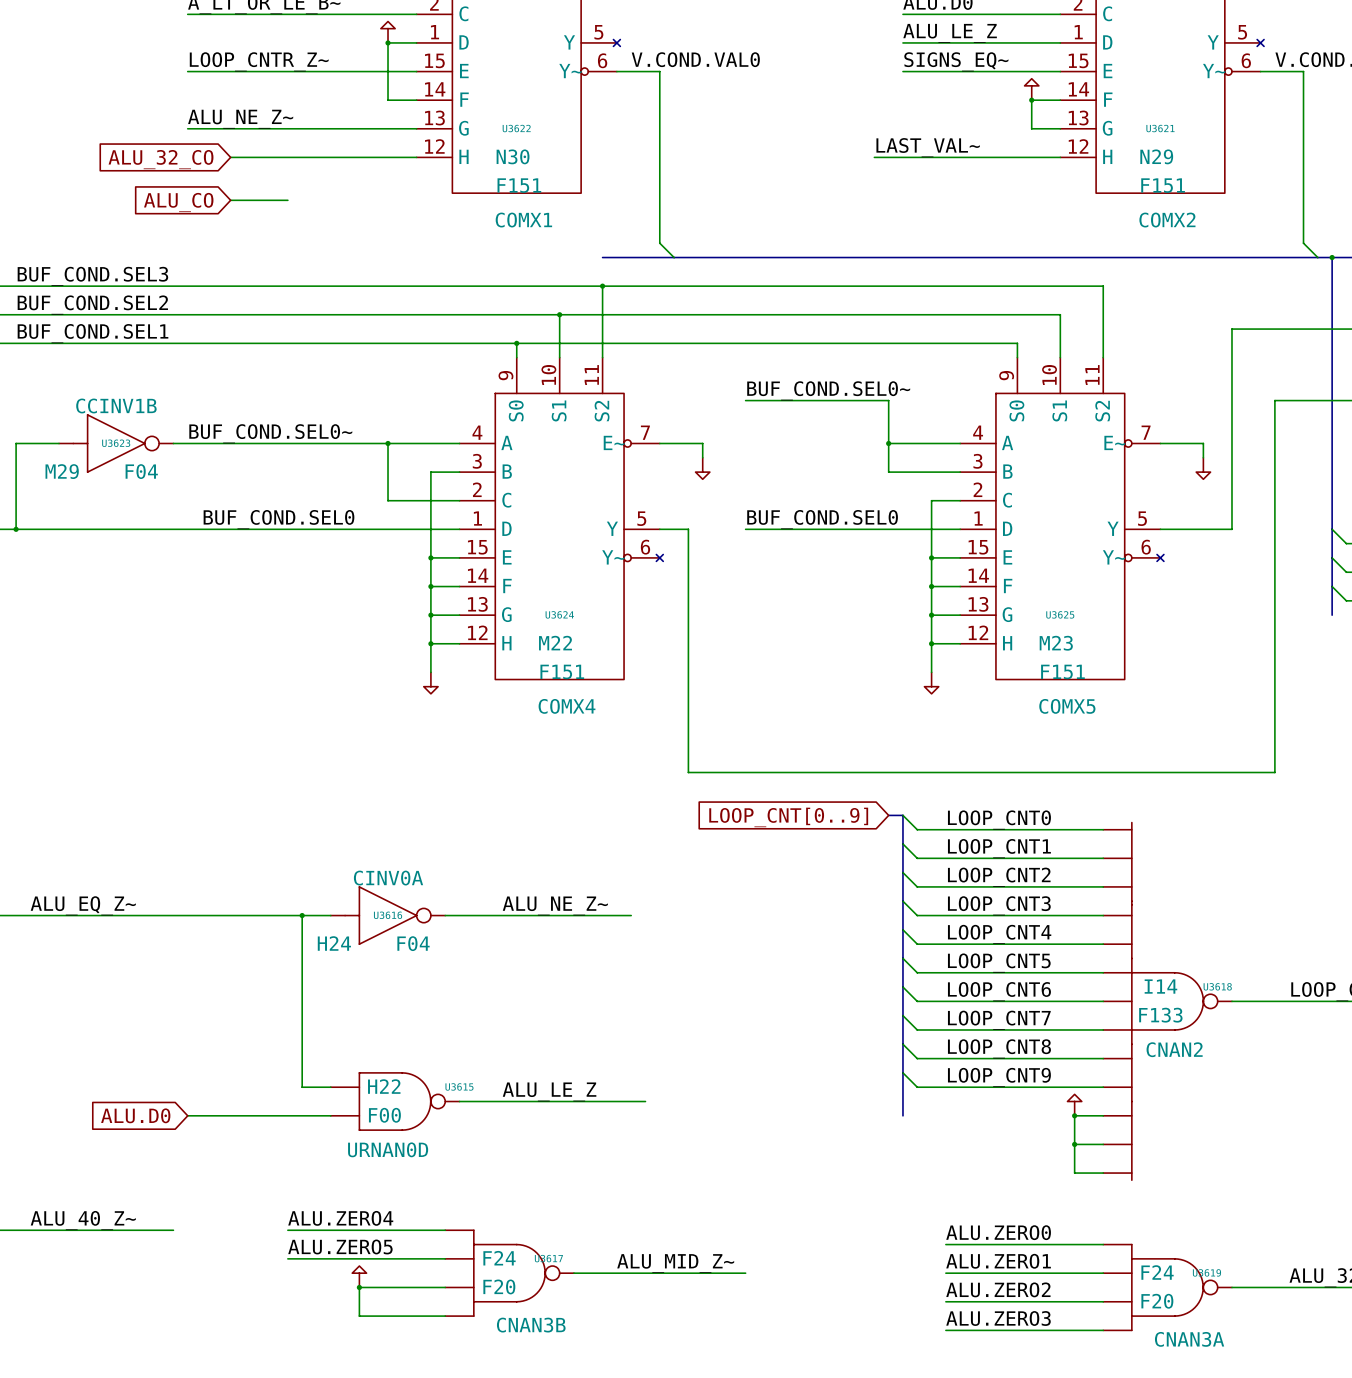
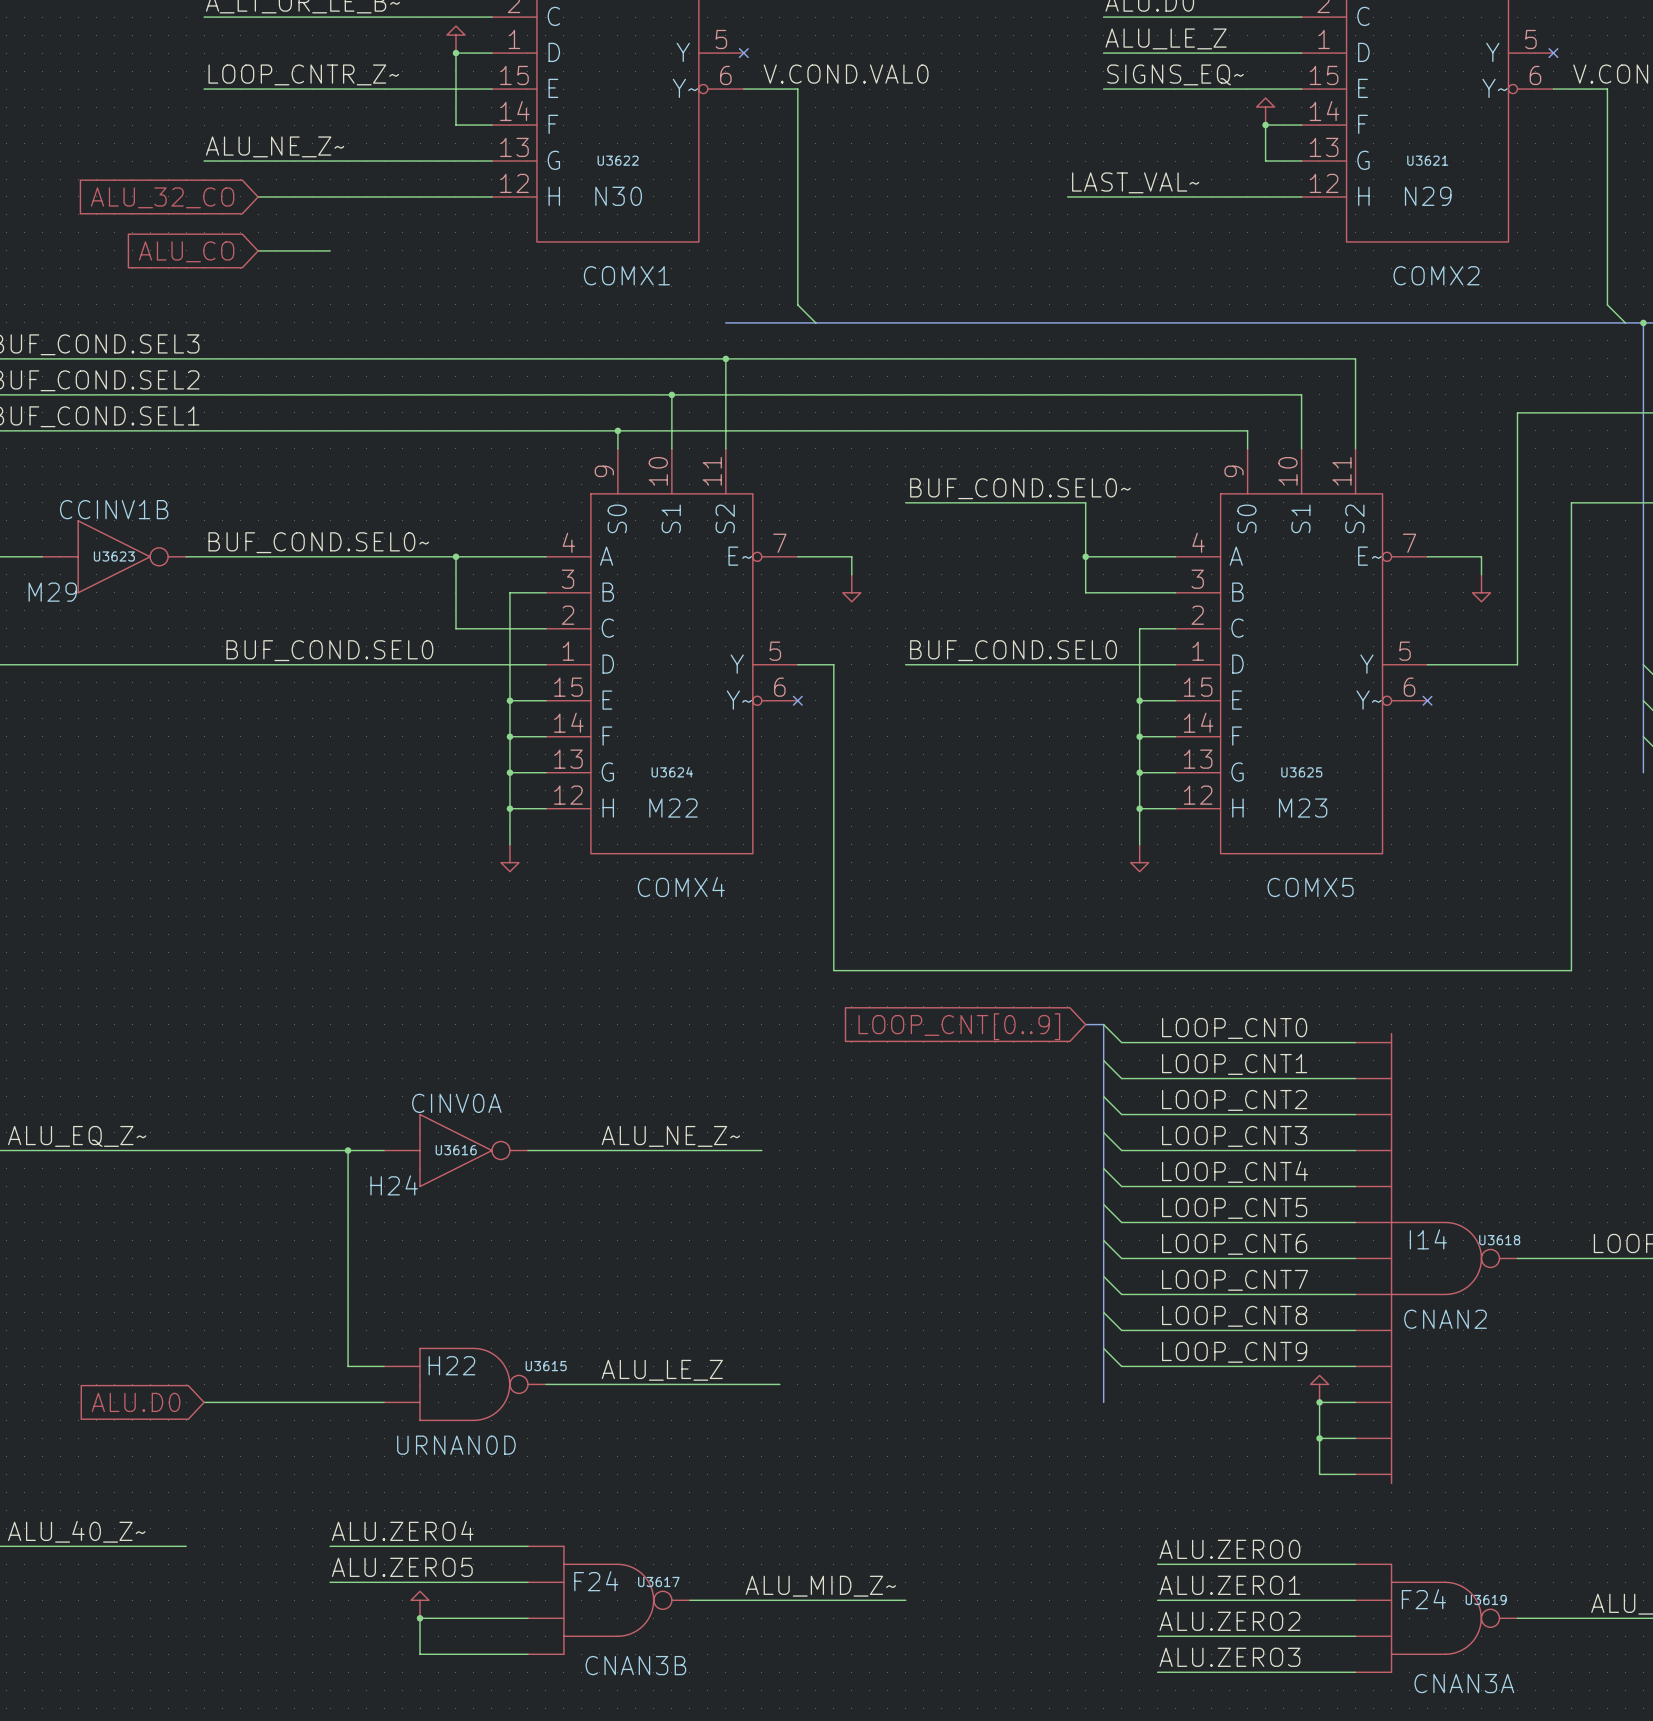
U3622 value: F151 (519, 185) -> none
U3621 value: F151 (1163, 185) -> none
U3623 value: F04 (141, 471) -> none
U3624 value: F151 (562, 671) -> none
U3625 value: F151 (1062, 671) -> none
U3616 value: F04 (413, 943) -> none
U3618 value: F133 (1160, 1015) -> none
U3615 value: F00 (384, 1115) -> none
U3617 value: F20 (499, 1286) -> none
U3619 value: F20 (1157, 1301) -> none

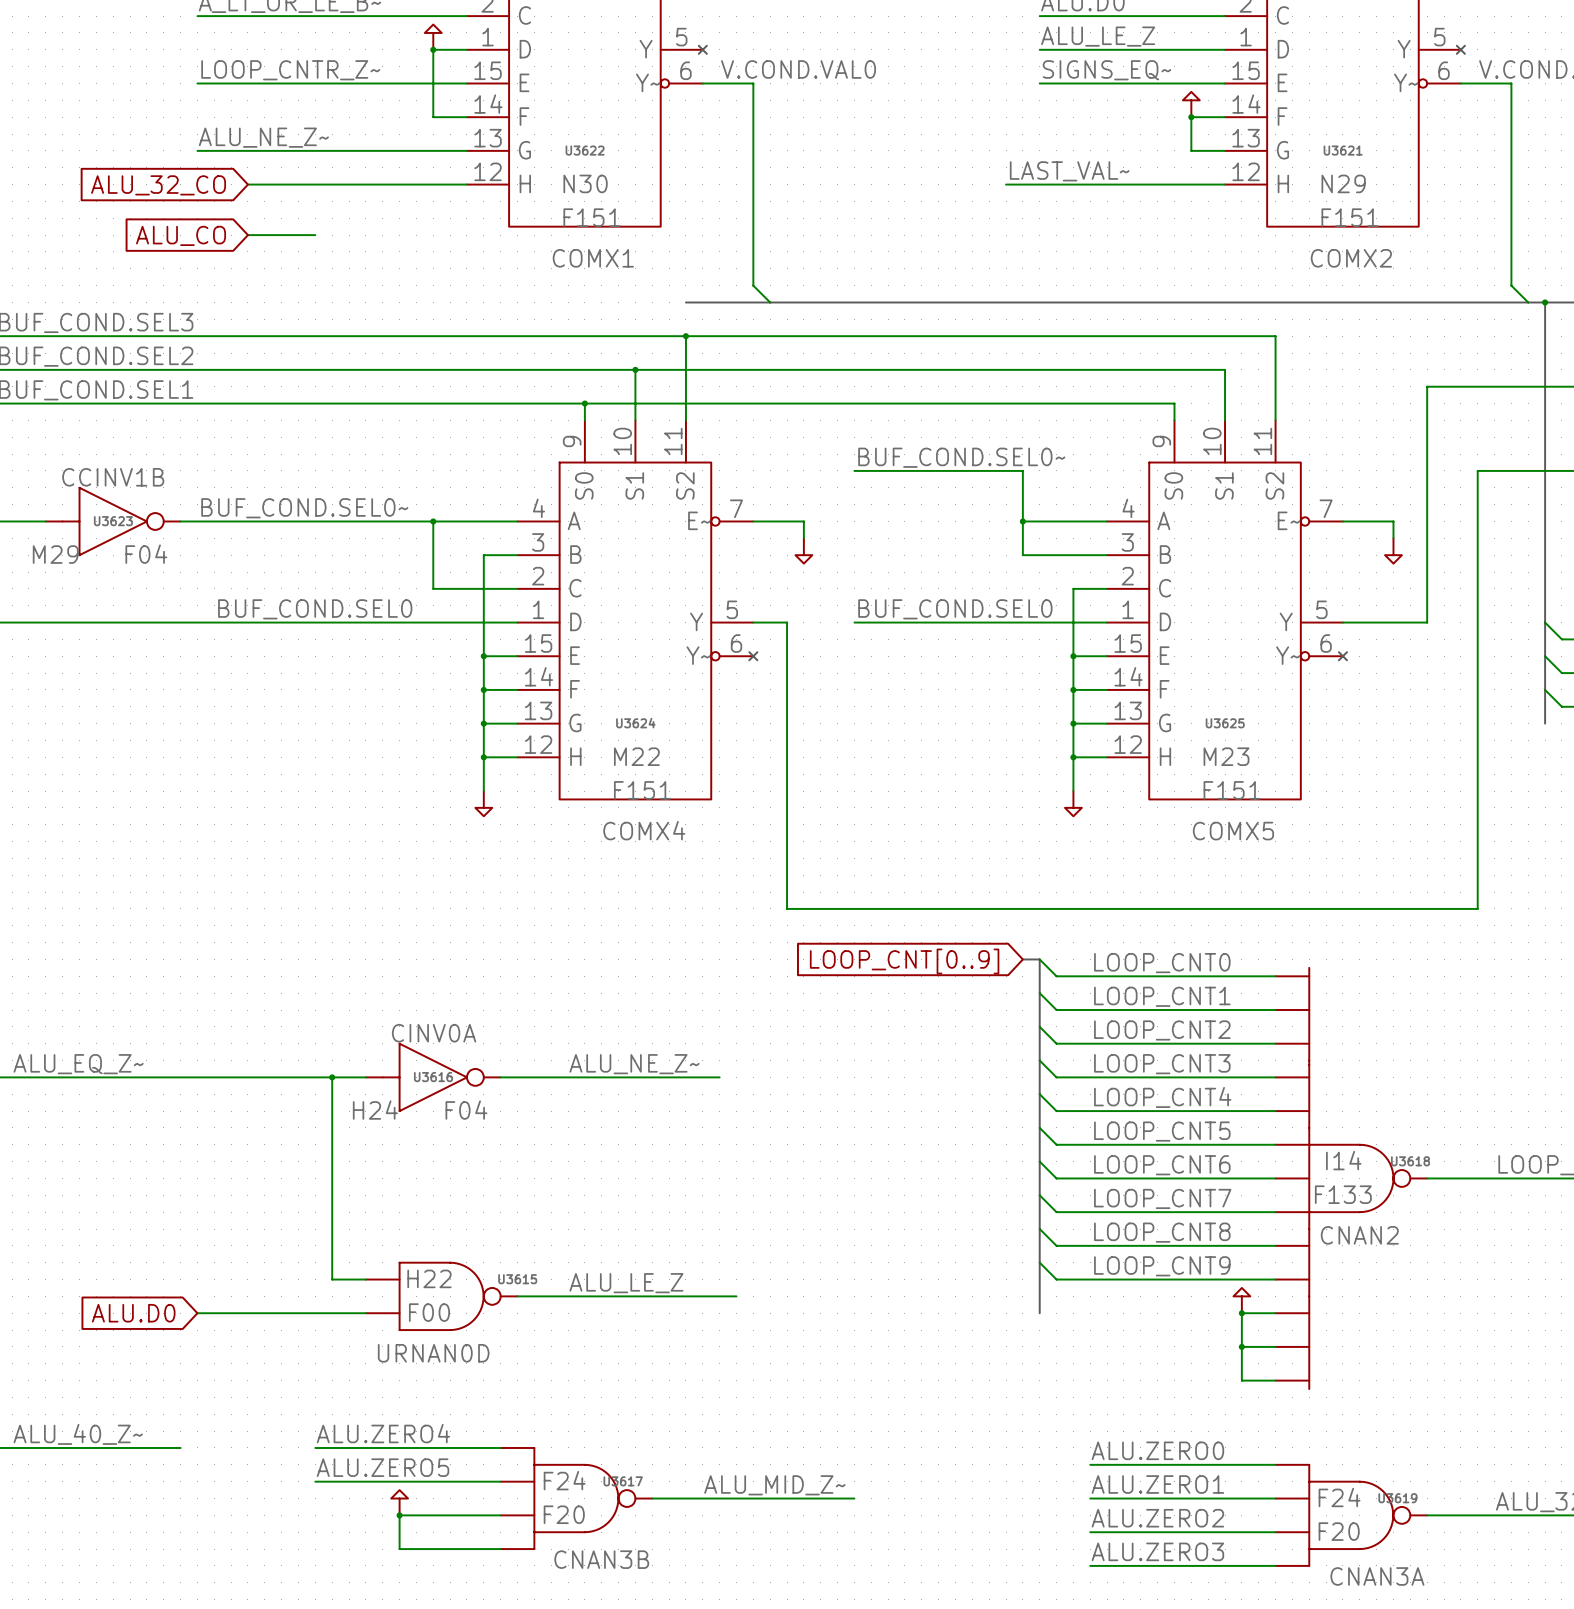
U3622 value: none -> F151 (591, 217)
U3621 value: none -> F151 (1350, 217)
U3623 value: none -> F04 (146, 554)
U3624 value: none -> F151 (642, 790)
U3625 value: none -> F151 (1232, 790)
U3616 value: none -> F04 (466, 1110)
U3618 value: none -> F133 (1343, 1194)
U3615 value: none -> F00 (429, 1312)
U3617 value: none -> F20 (564, 1514)
U3619 value: none -> F20 (1339, 1531)

